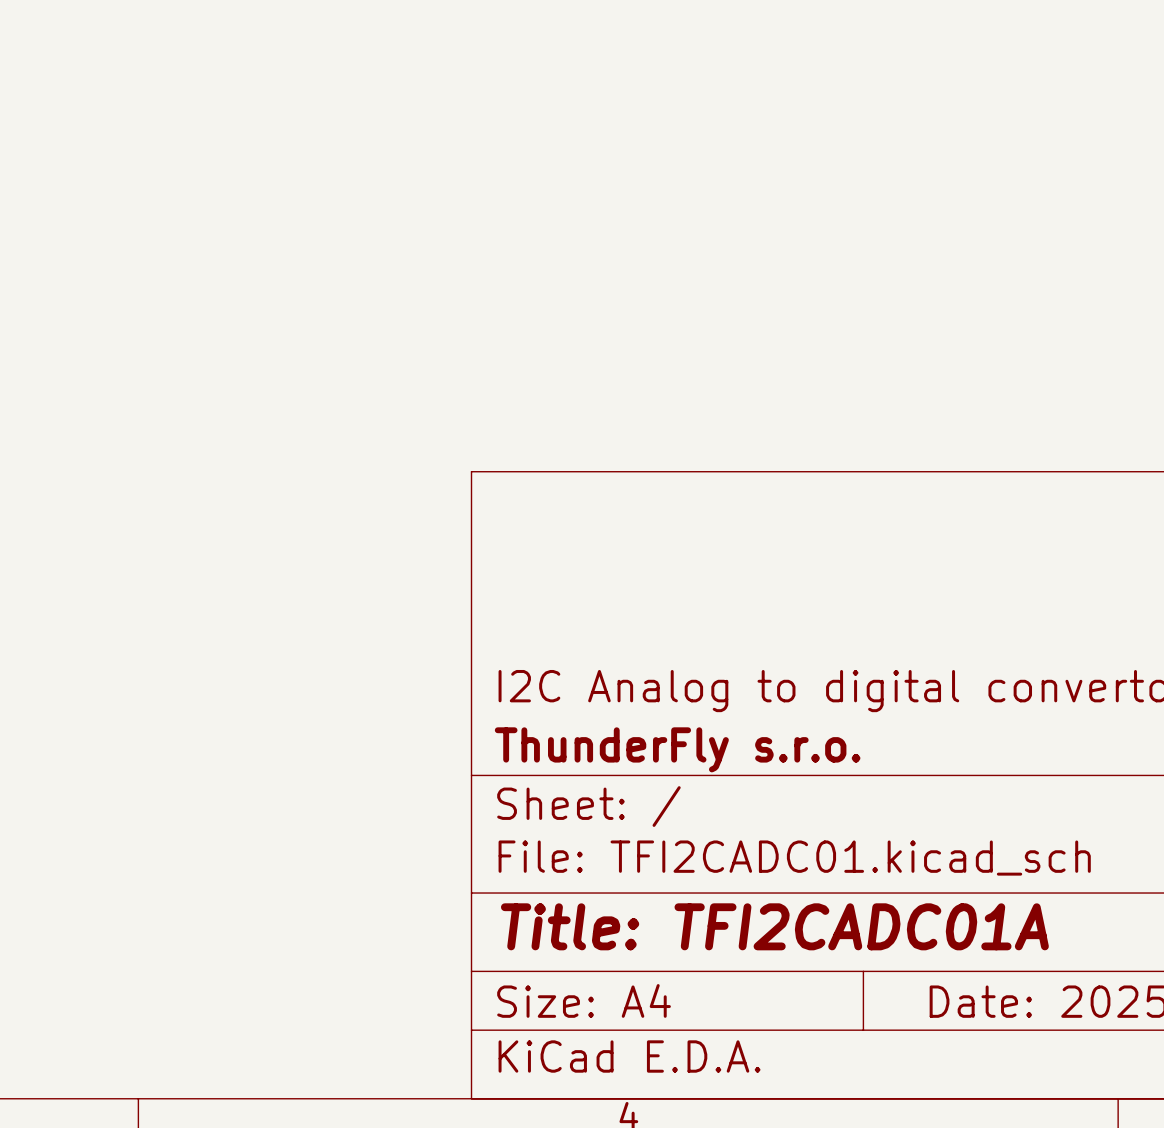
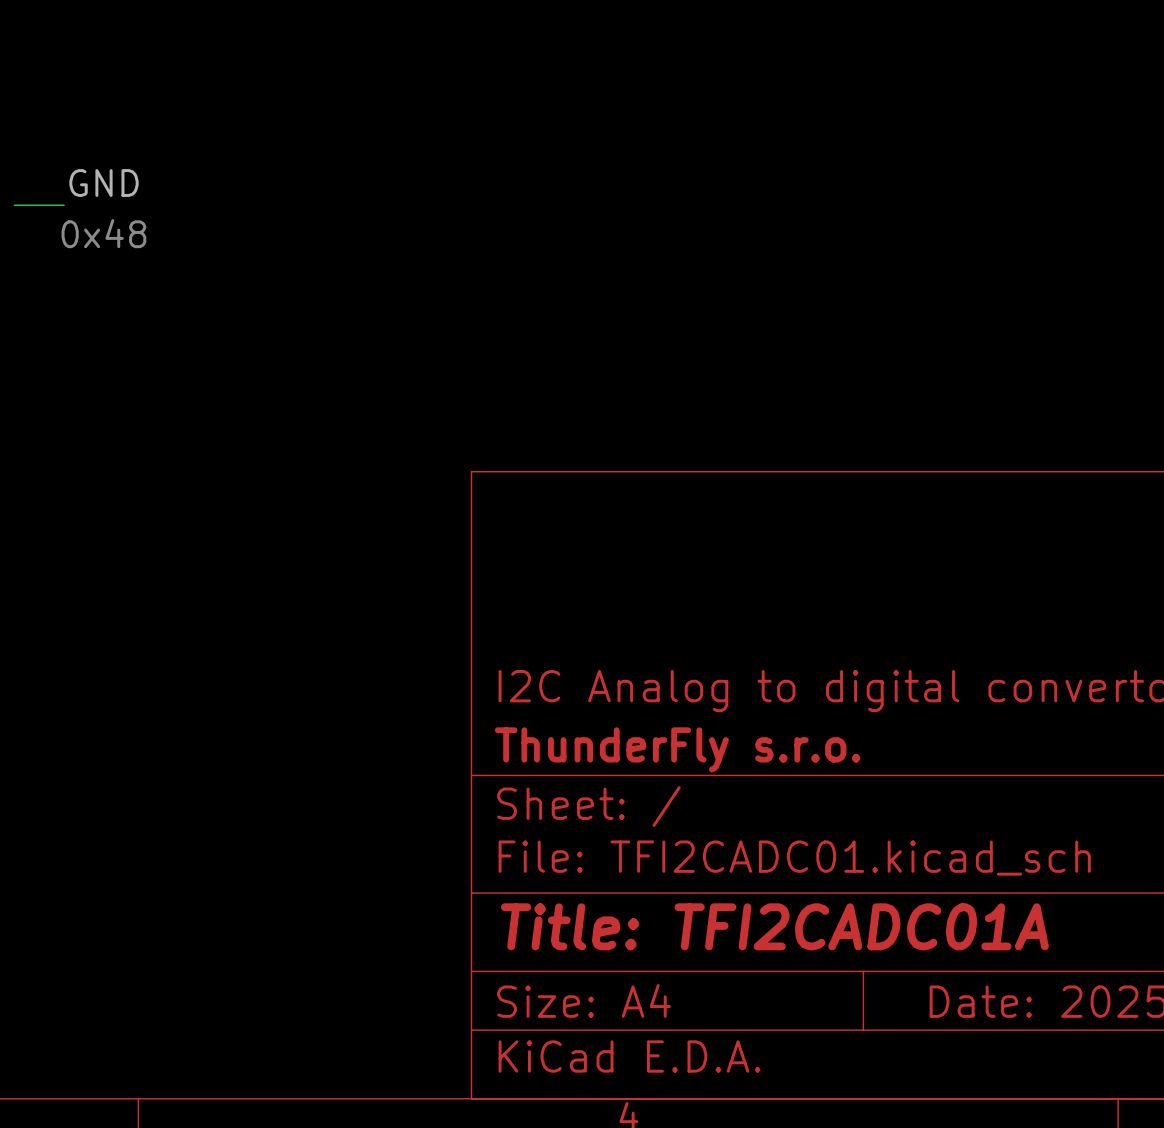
label: none -> GND (104, 183)
wire: none -> (14, 205) (64, 205)
text: none -> 0x48 (103, 233)

